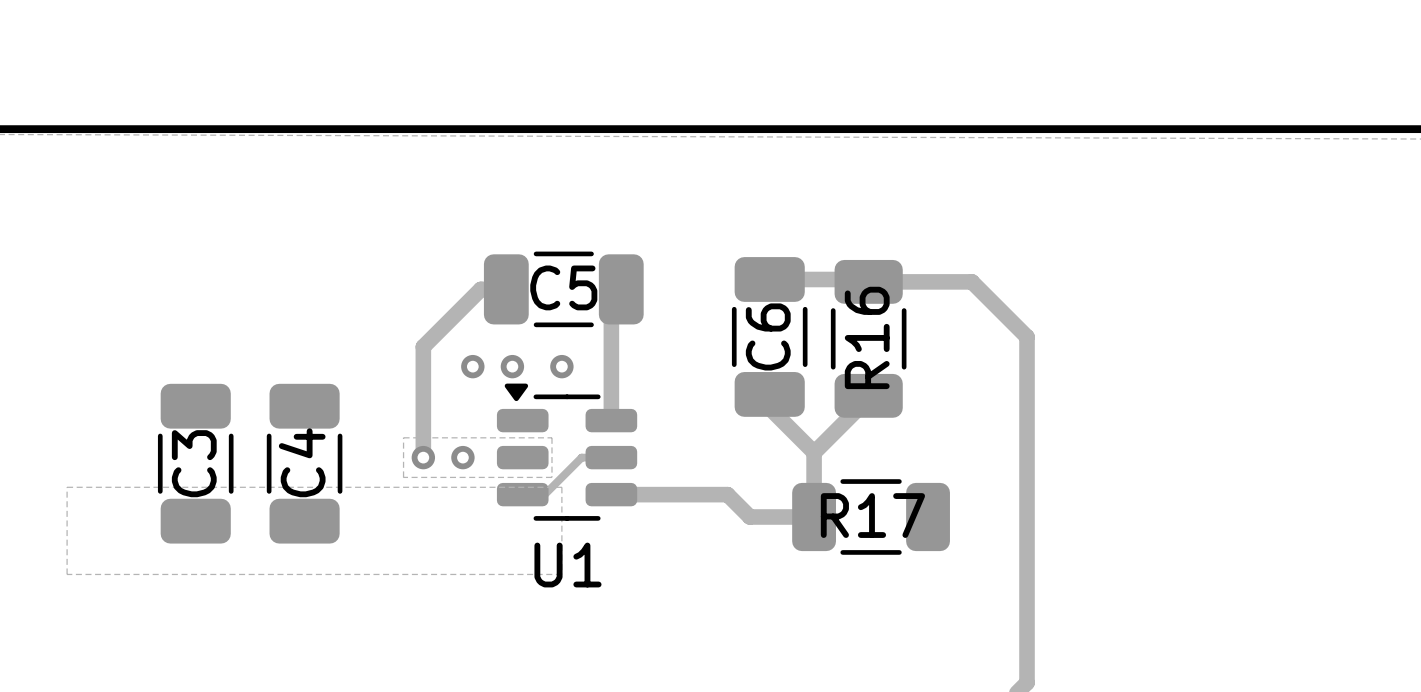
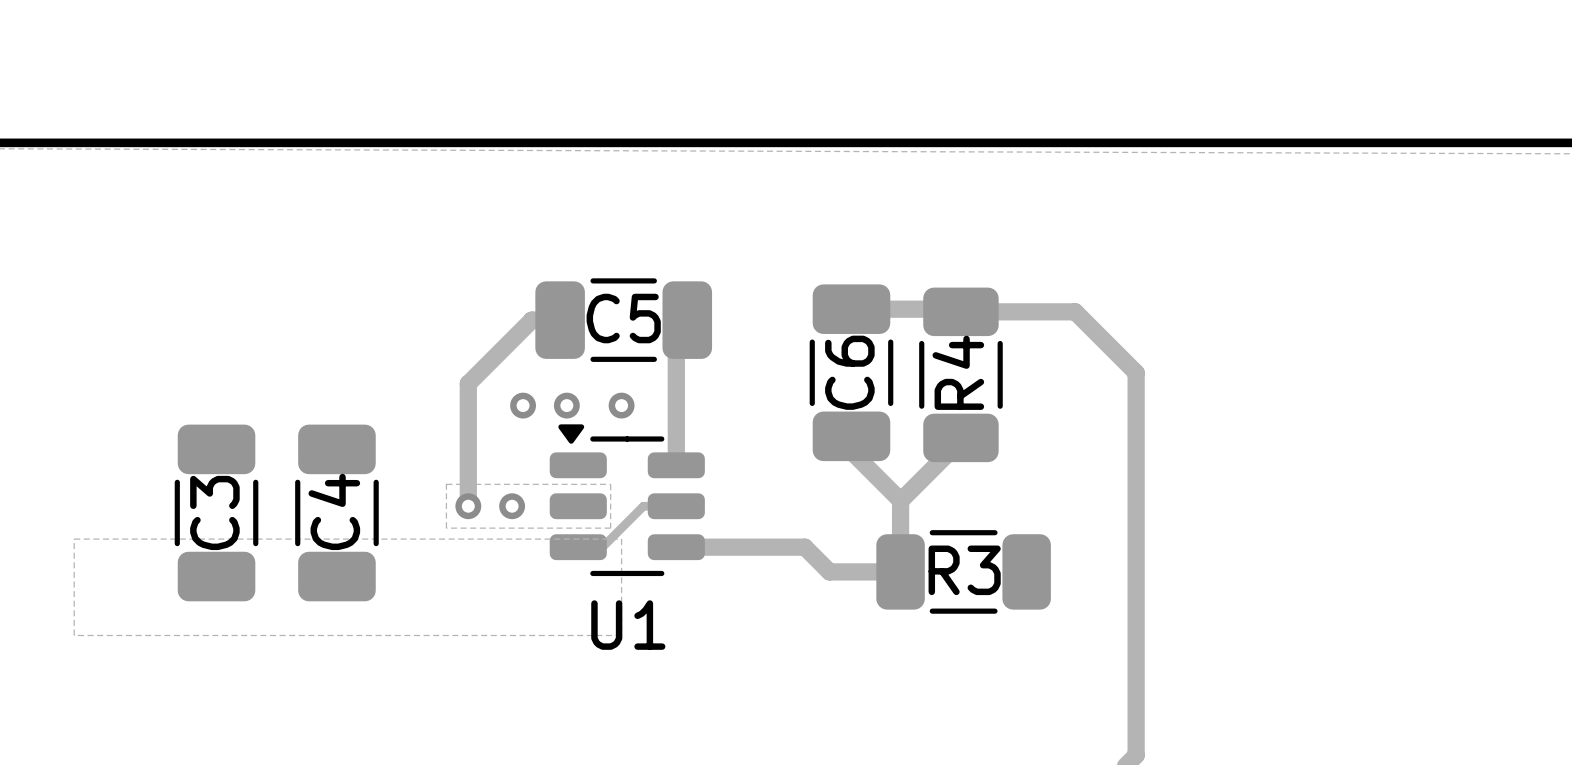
R16 name: R16 (867, 337) -> R4 (958, 372)
R17 name: R17 (872, 515) -> R3 (964, 570)

